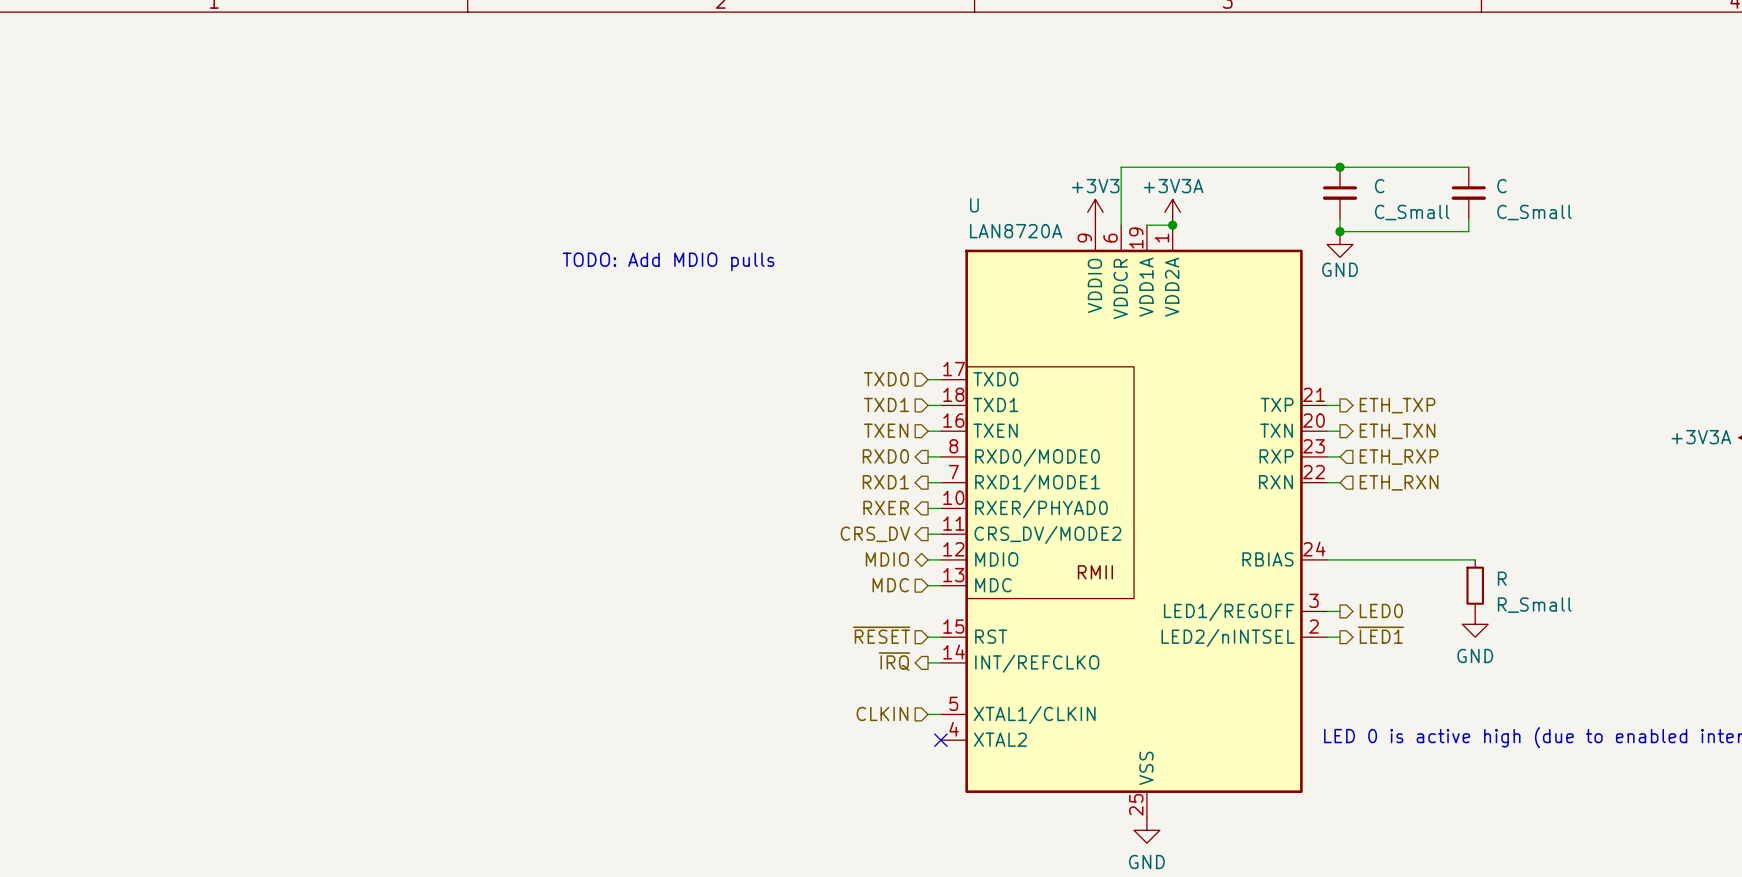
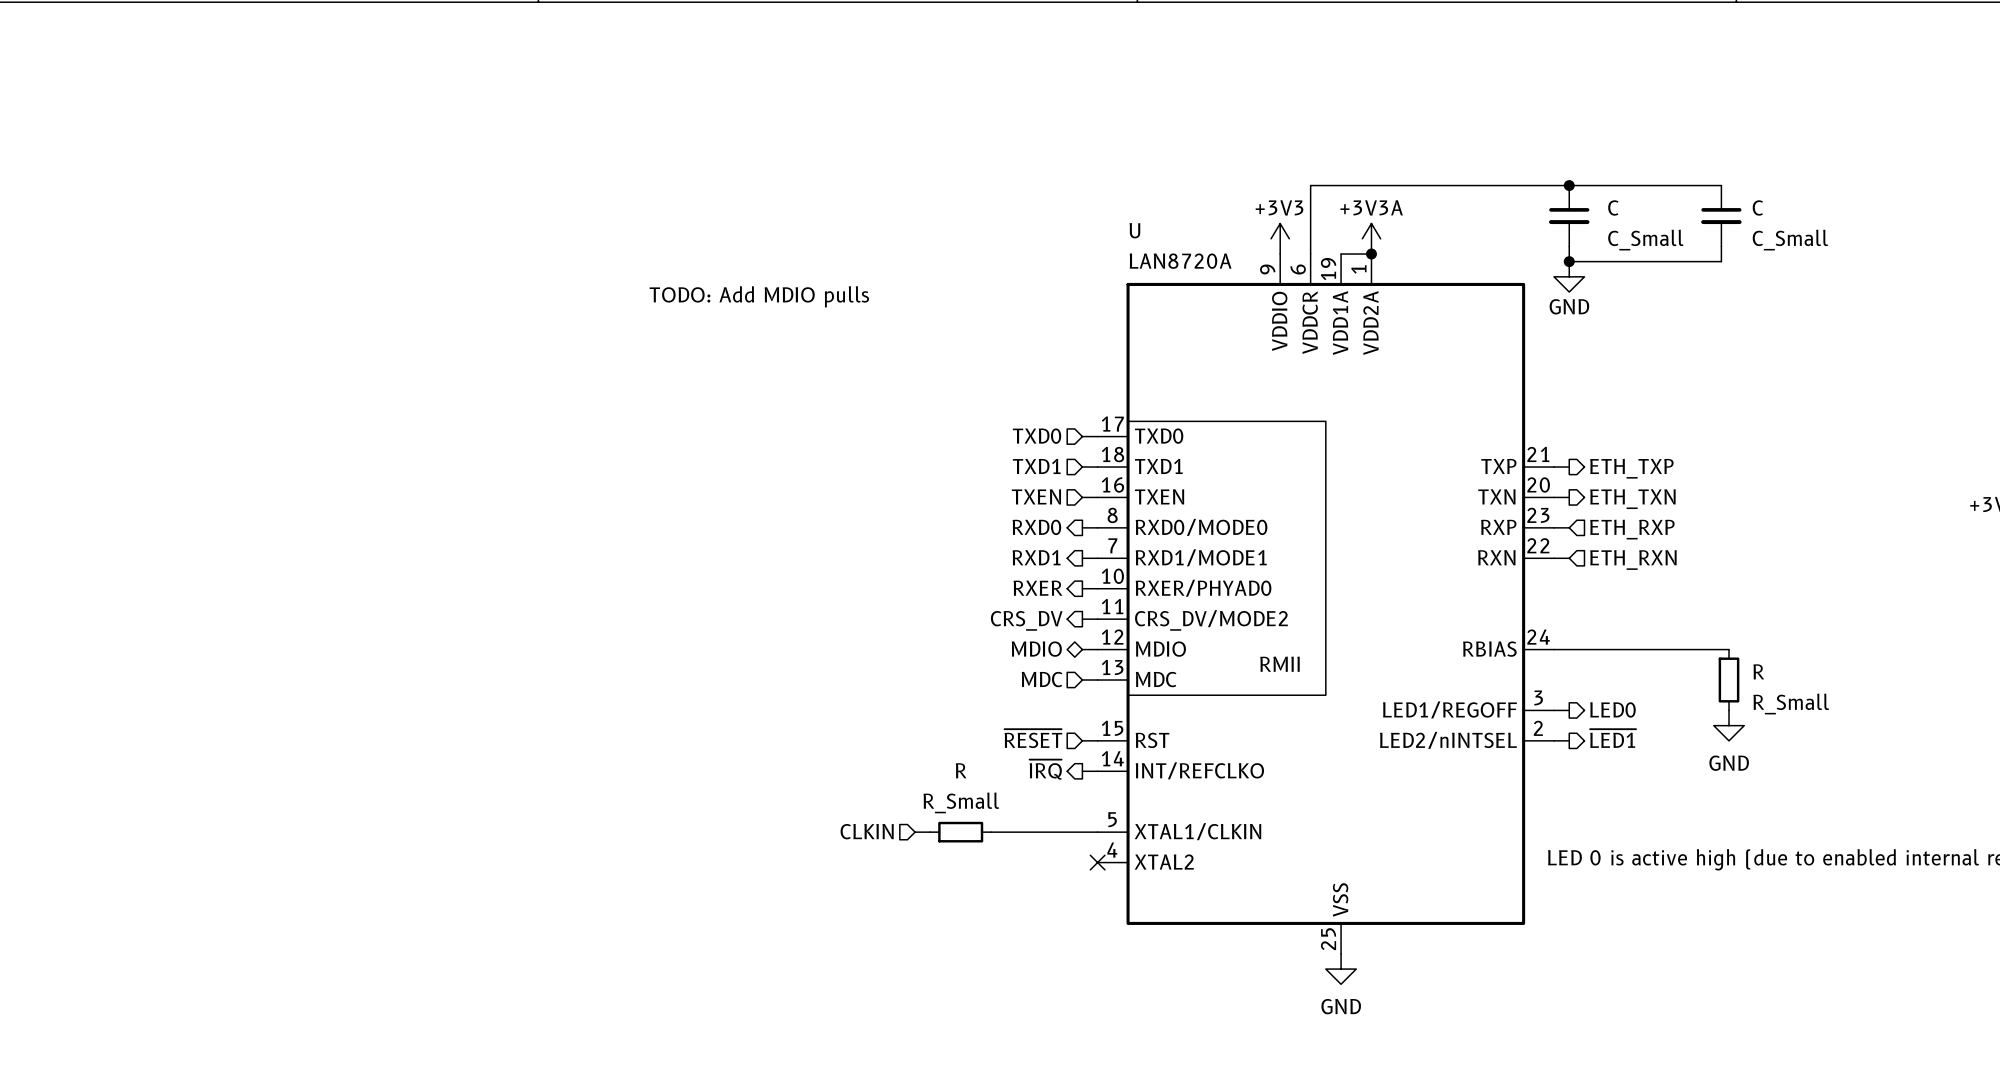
hierarchical label position: CLKIN (882, 713) -> CLKIN (867, 831)
wire: none -> (915, 832) (930, 832)
R: none -> R_Small (960, 832)
wire: none -> (991, 832) (1082, 832)

